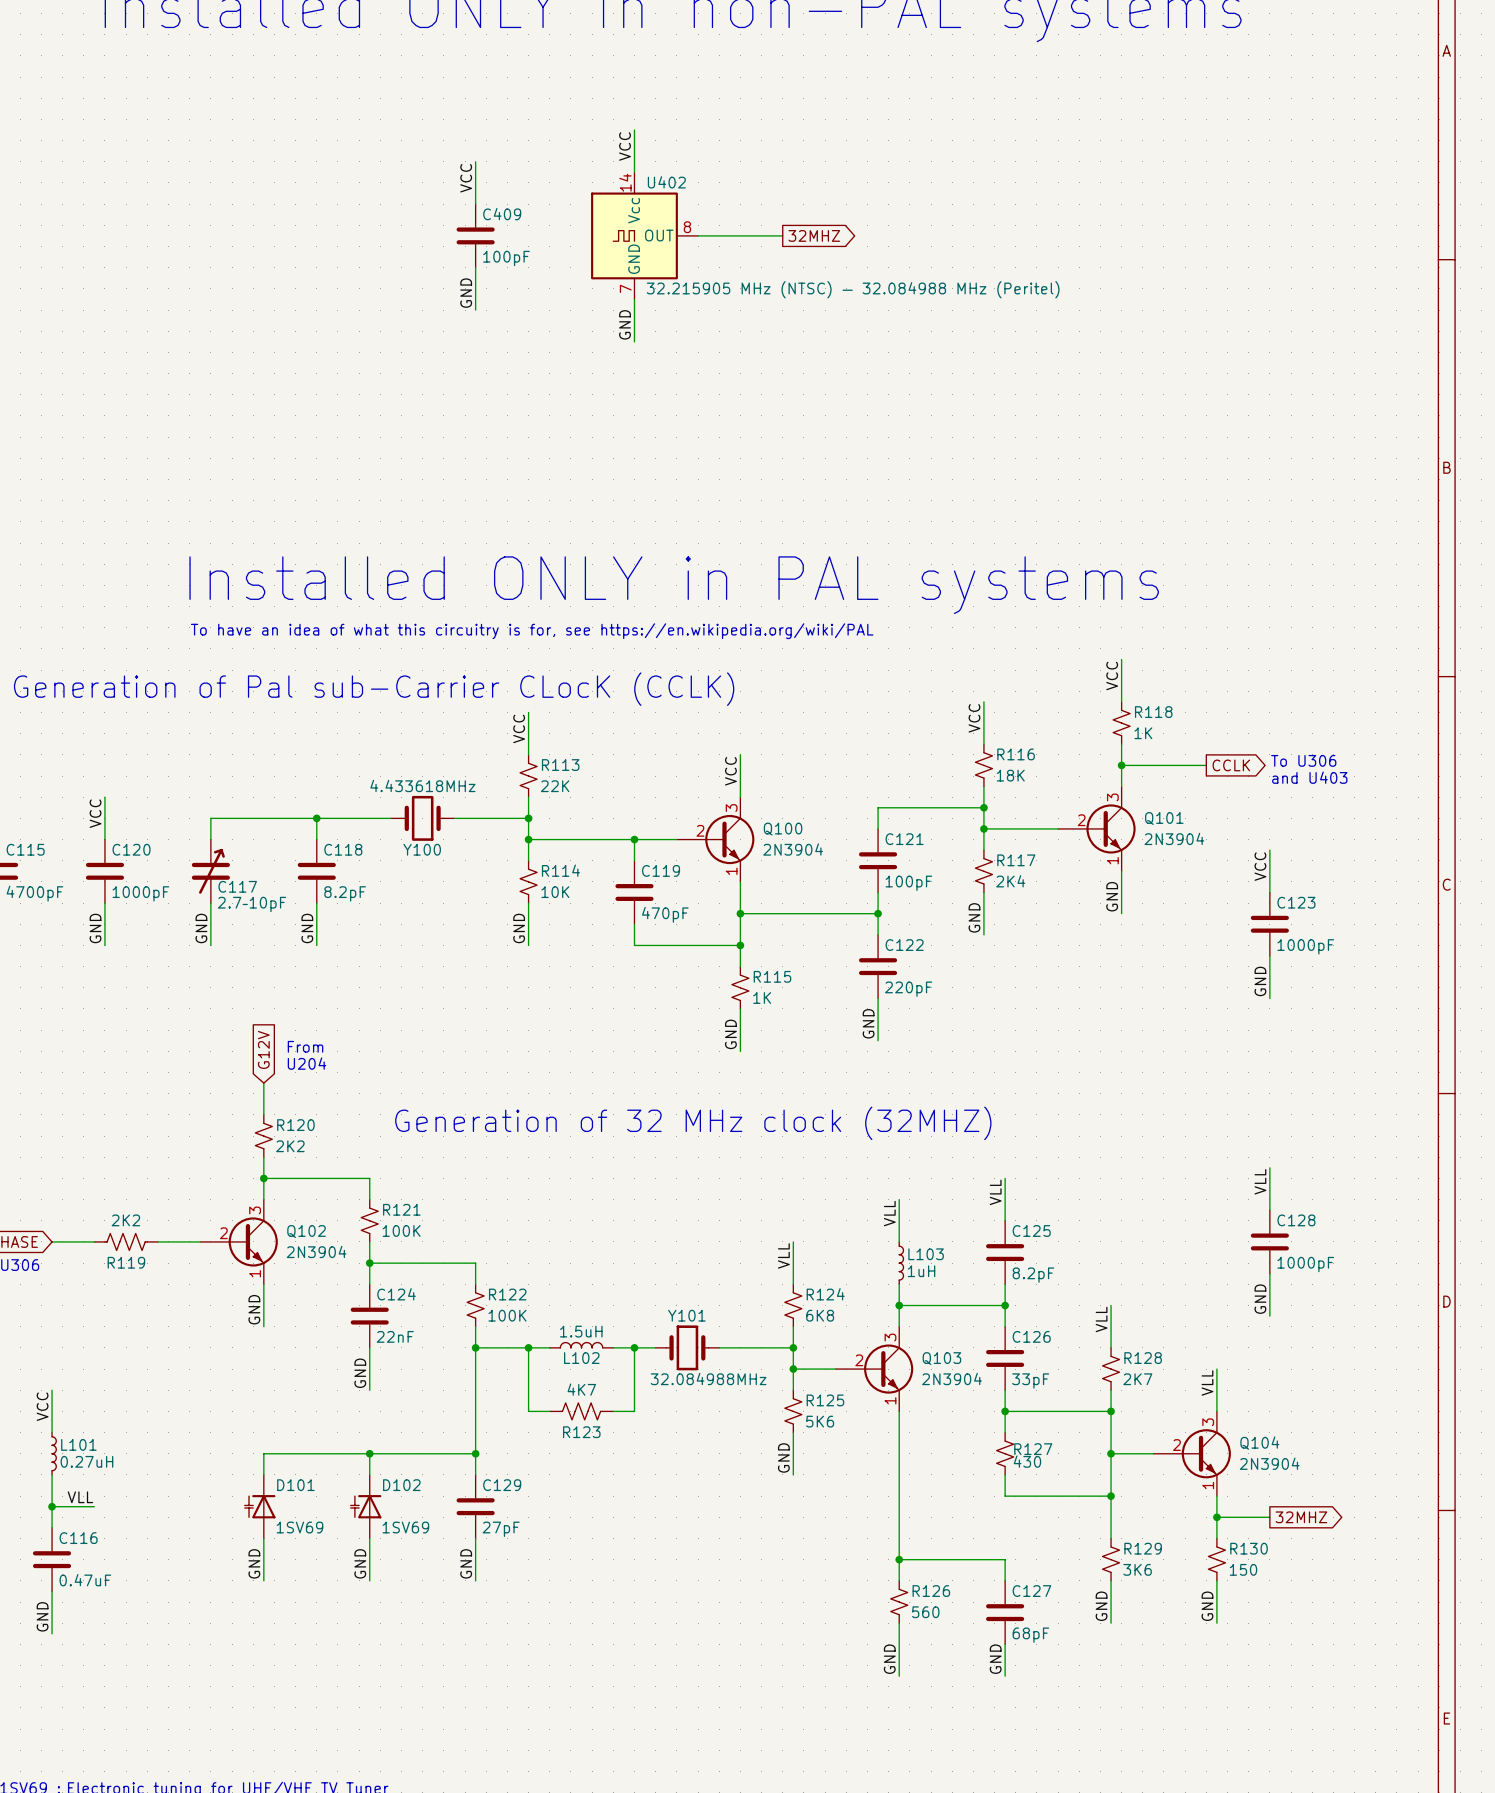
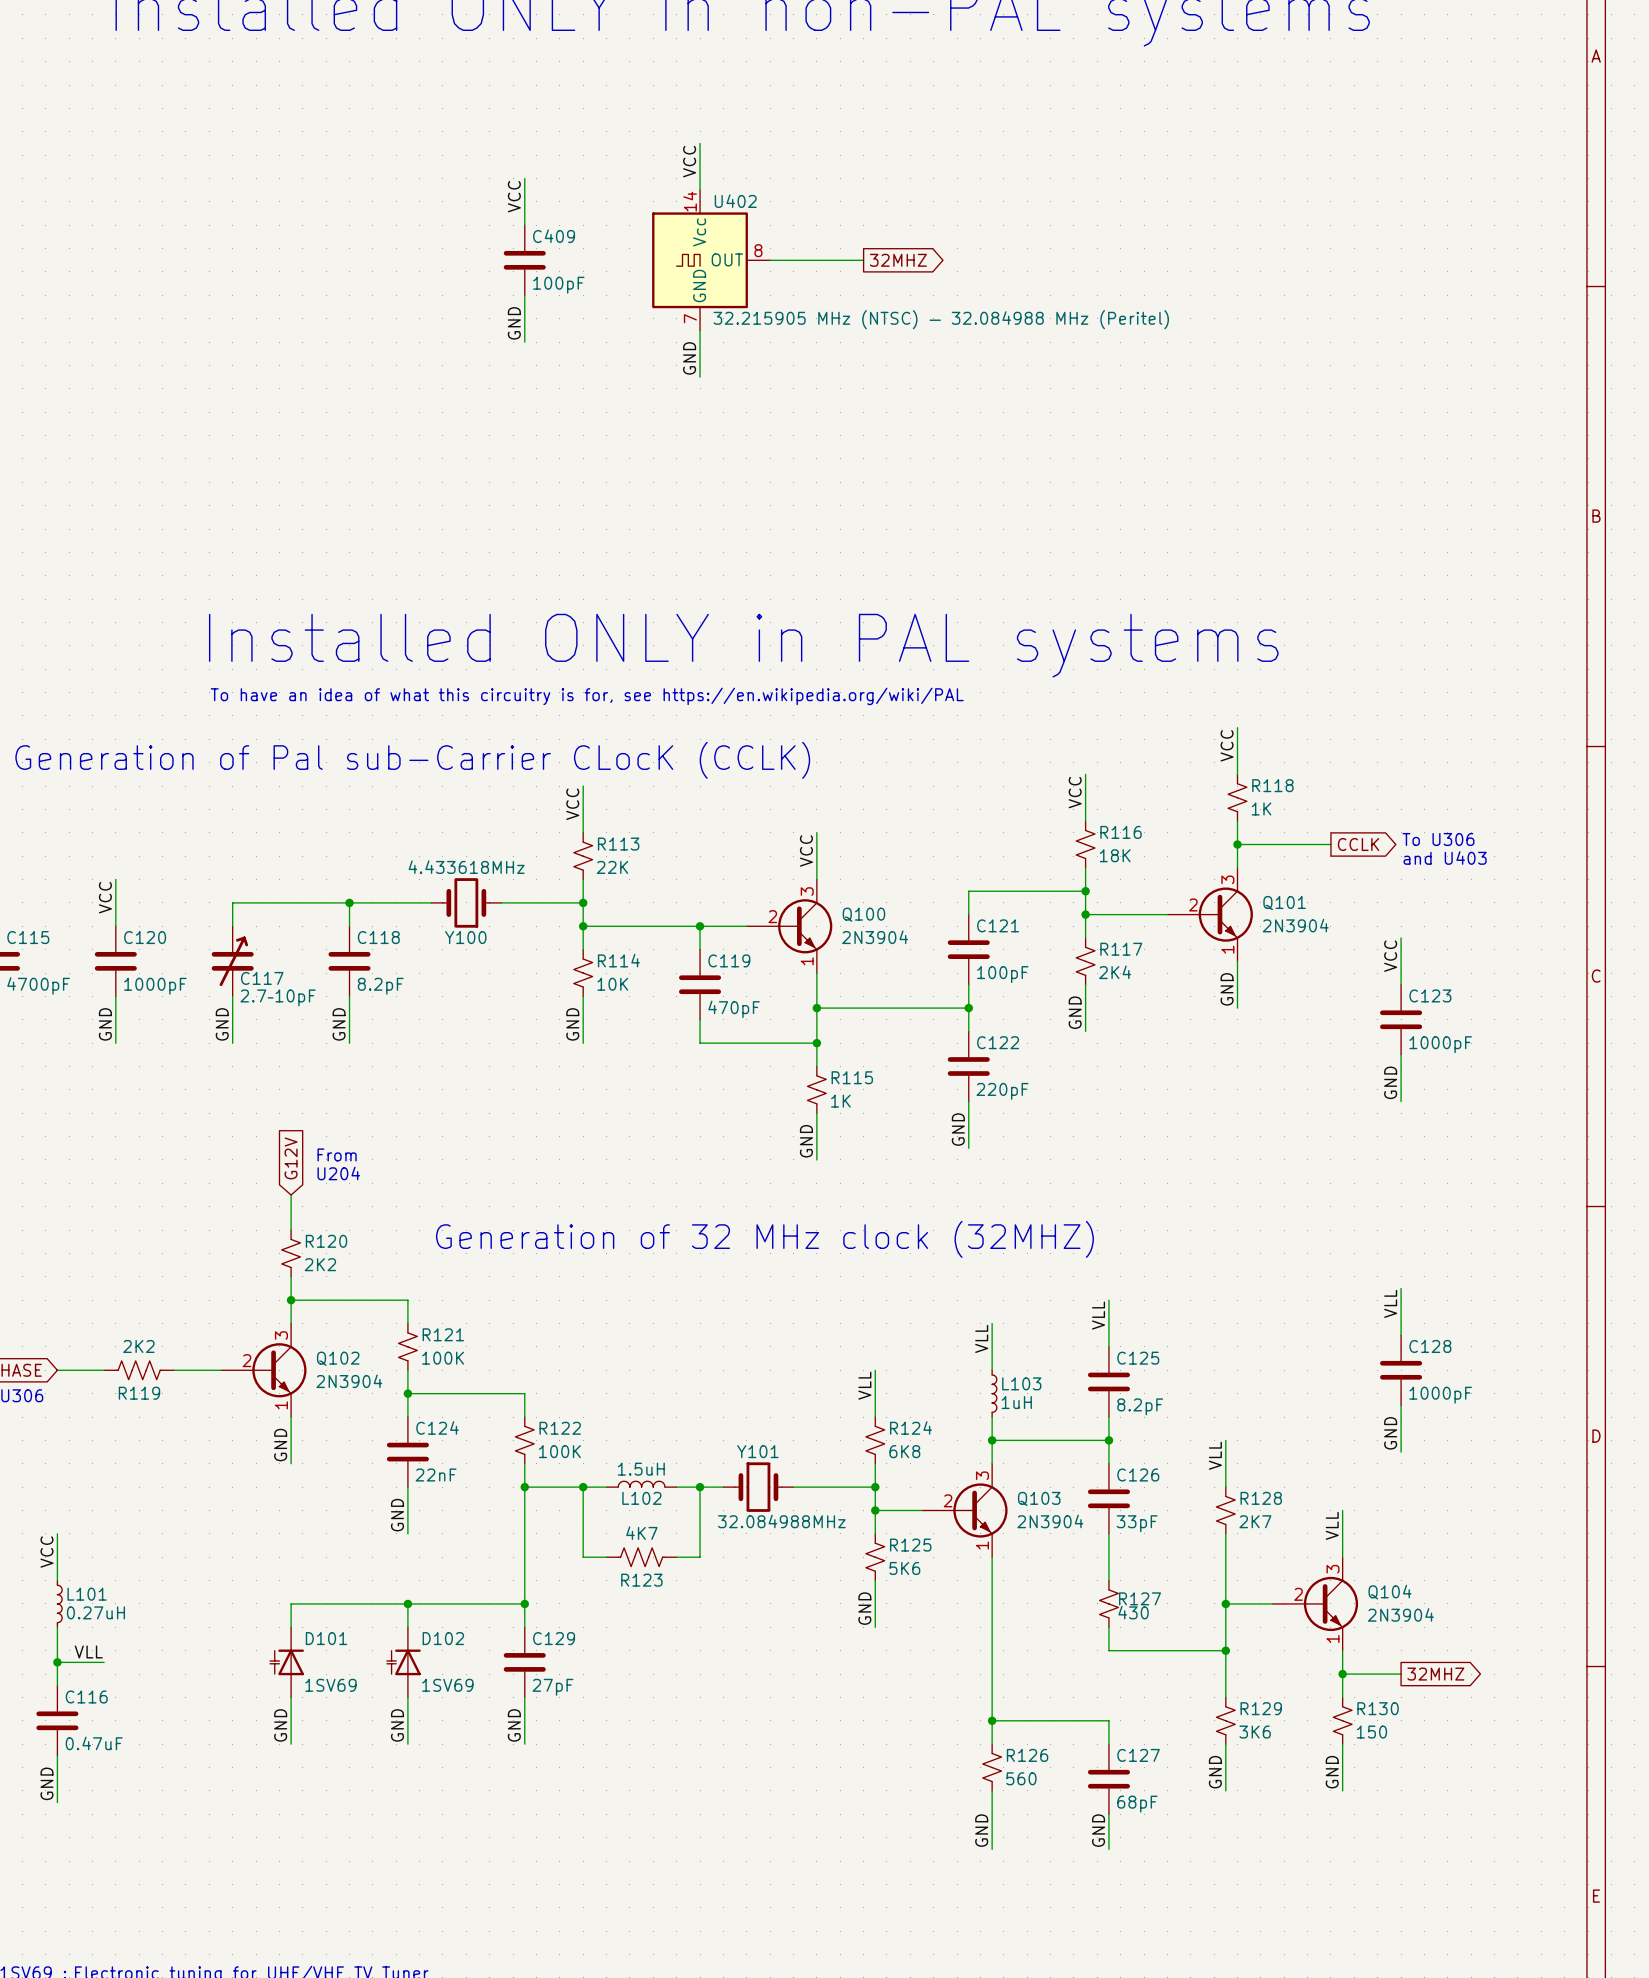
wire: (1005, 1411) (1111, 1411) -> none
junction: (1005, 1411) -> none
junction: (1111, 1411) -> none

